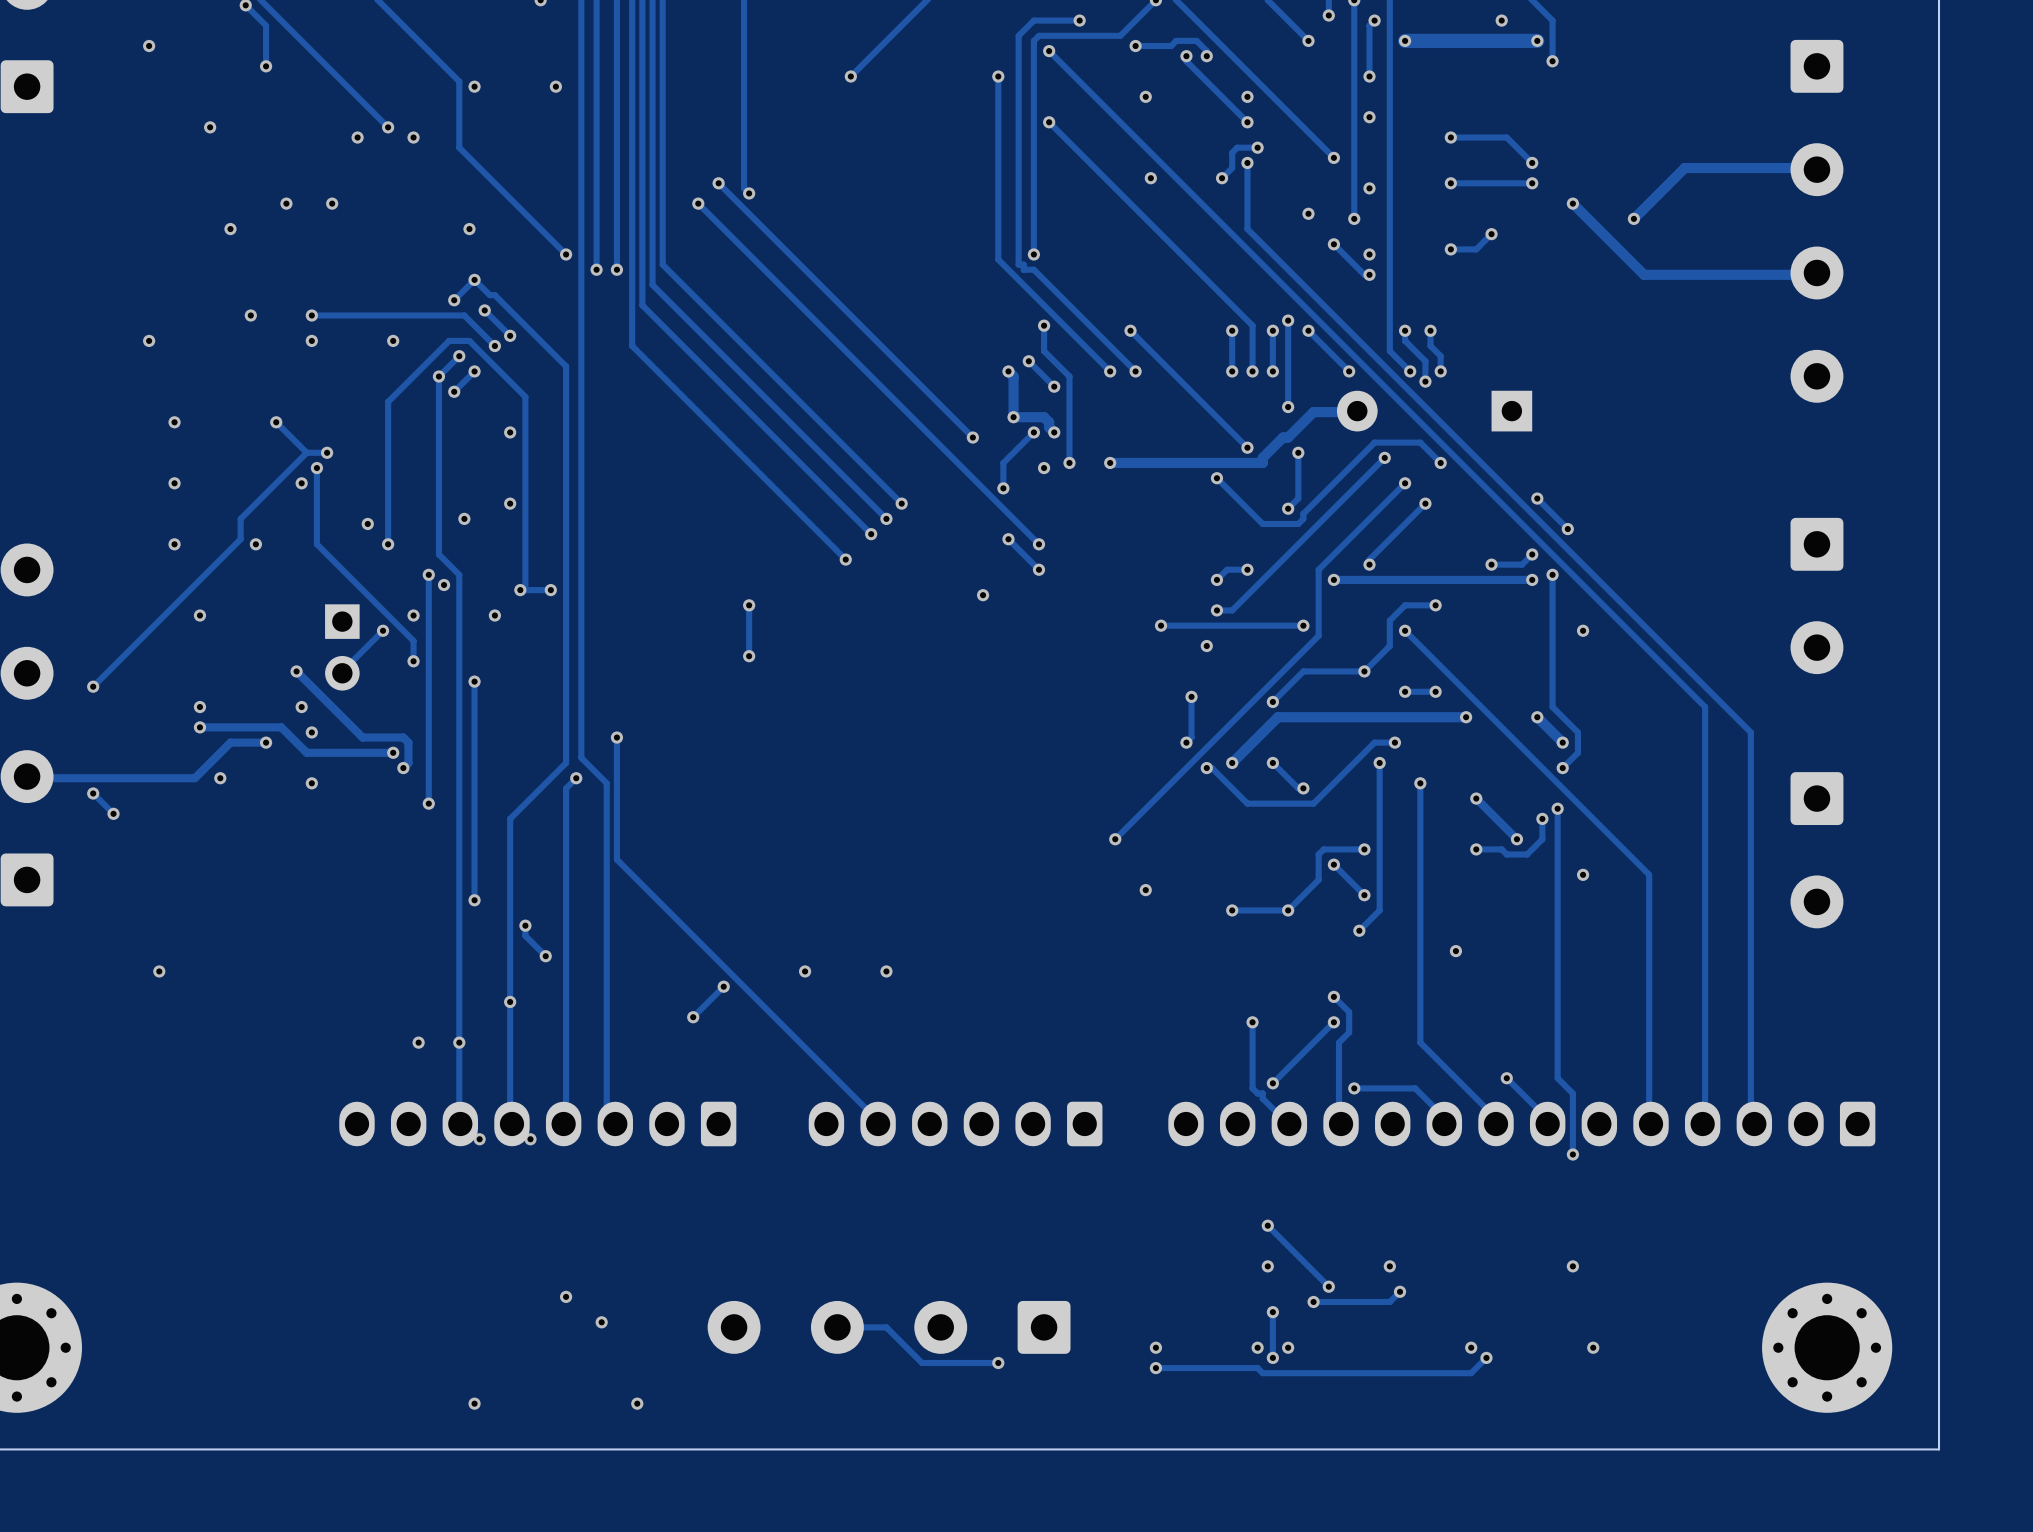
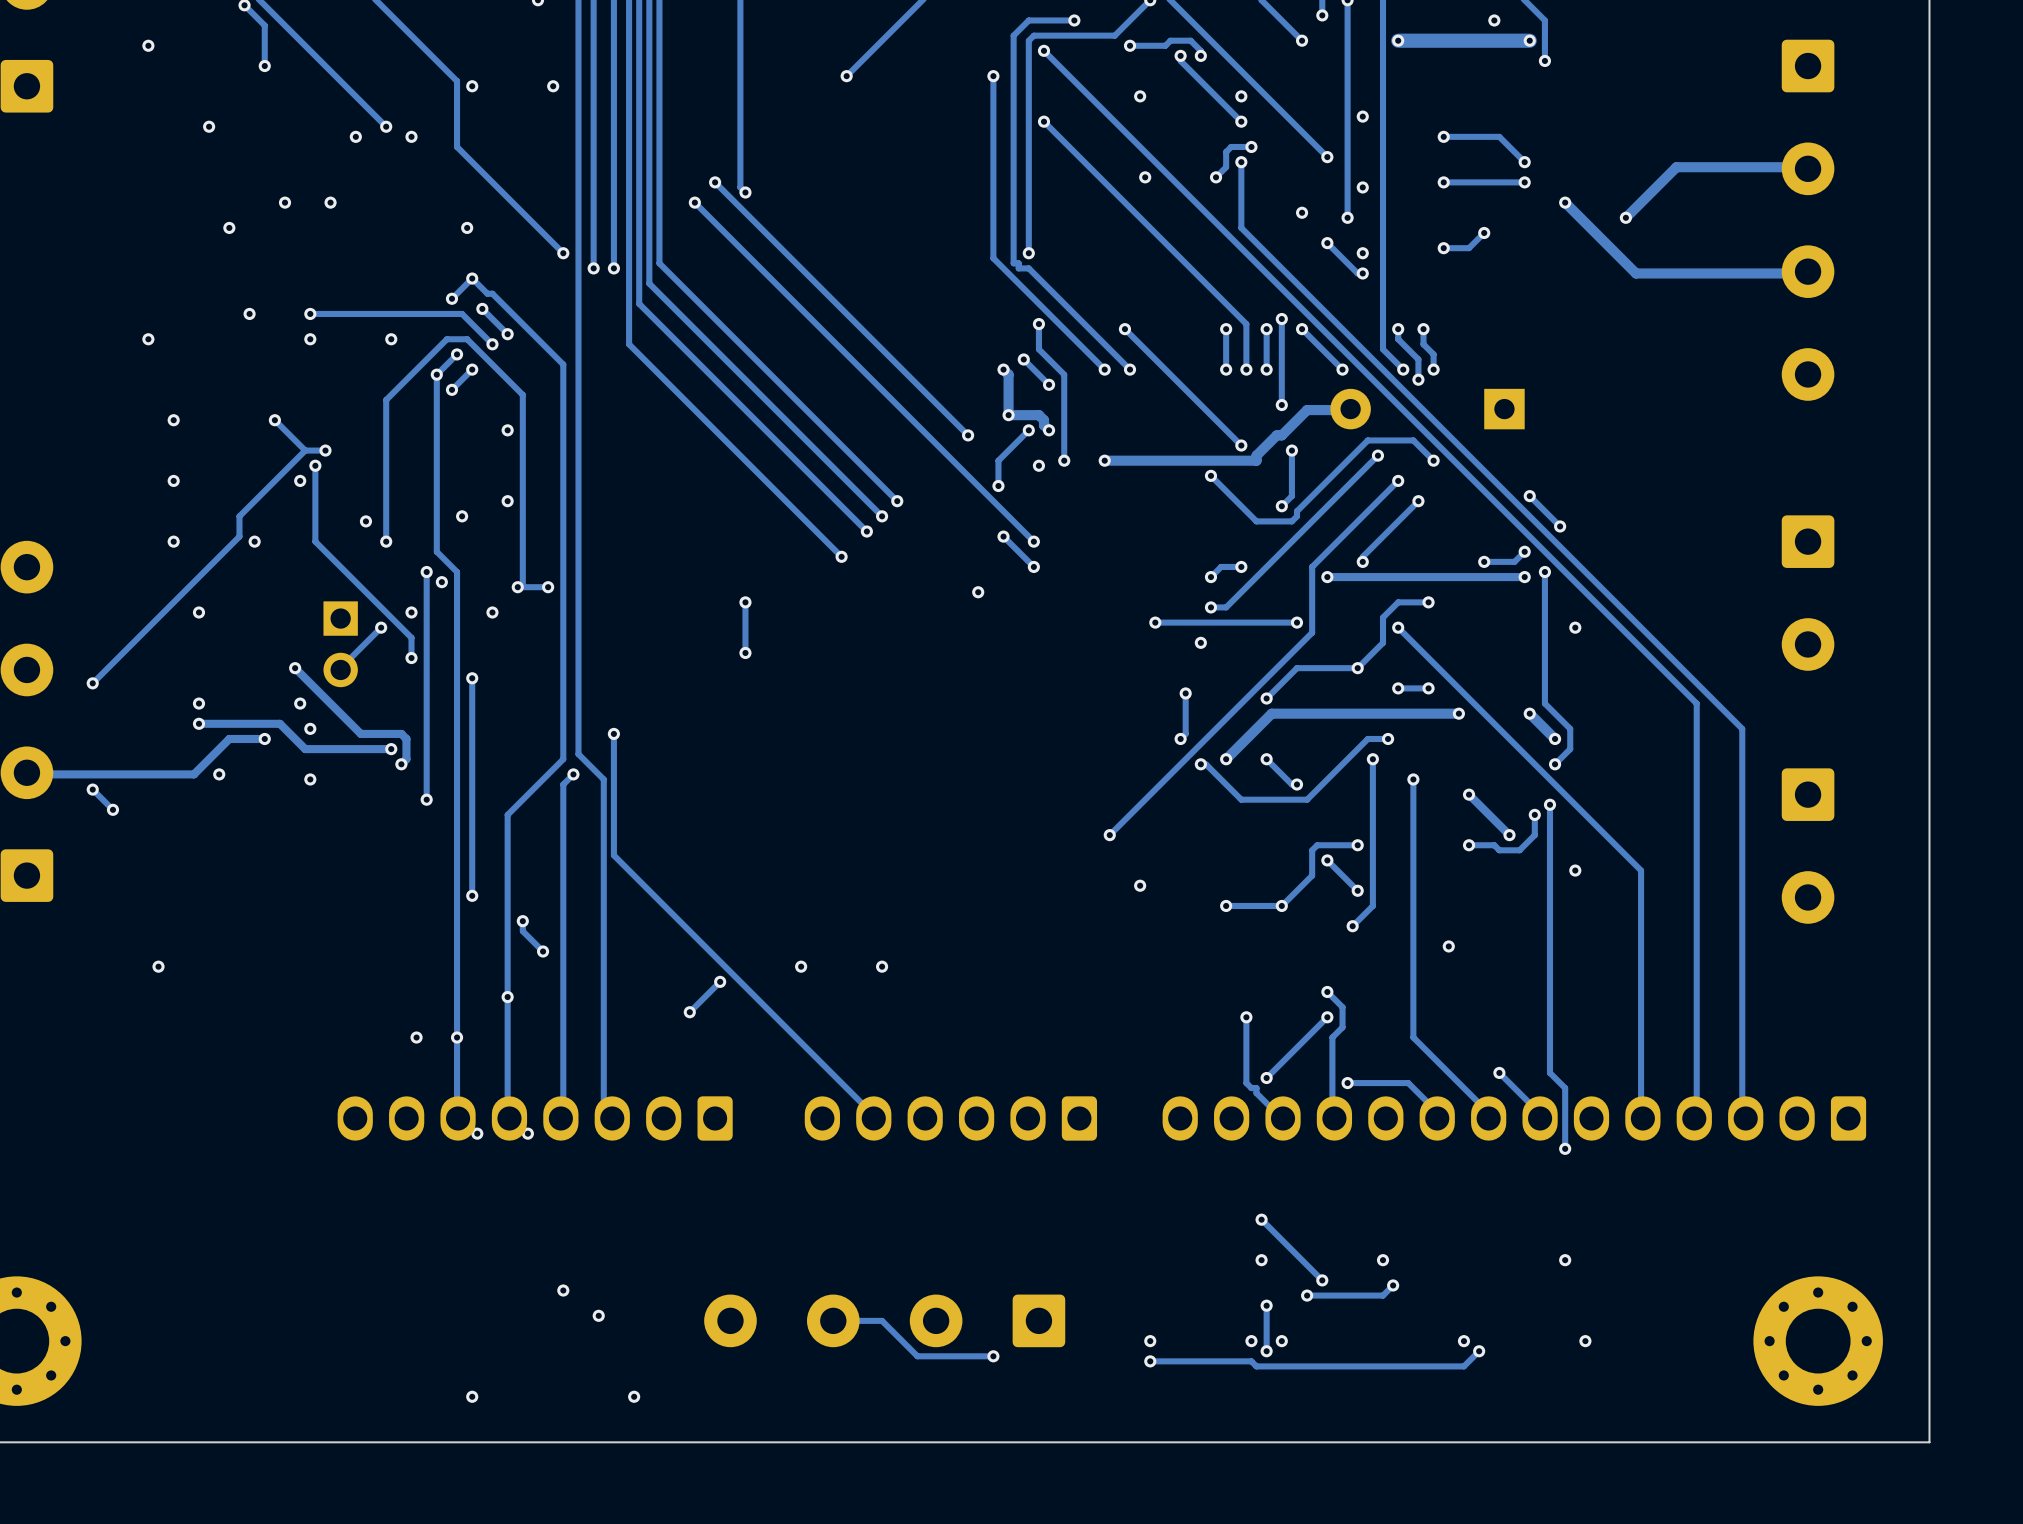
track: (1374, 20) (1369, 25) (1369, 76) -> none
via: (1374, 20) -> none
via: (1369, 76) -> none

